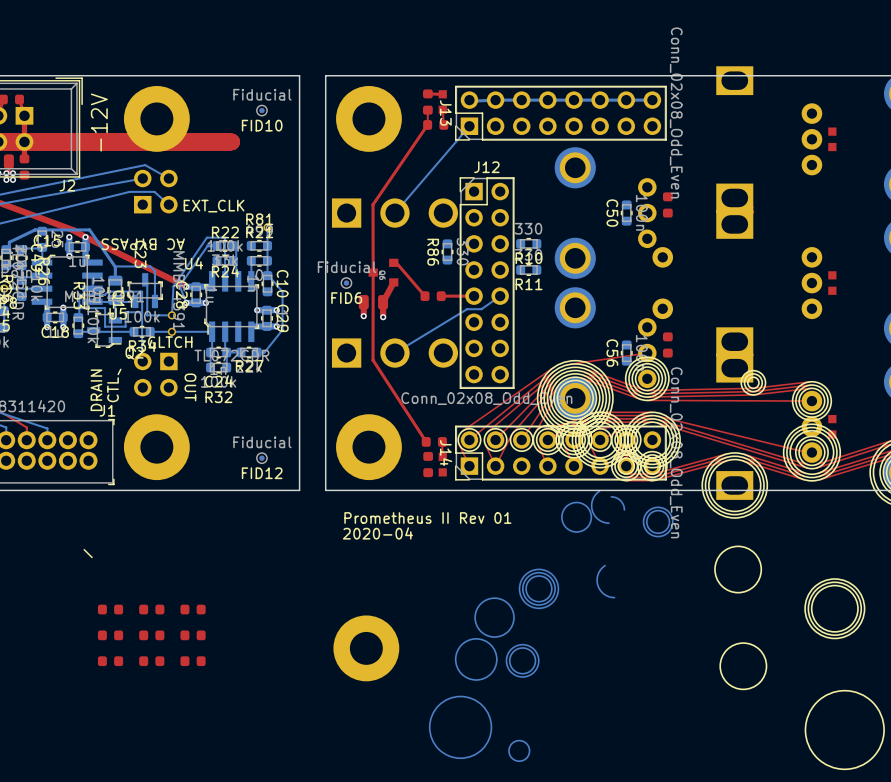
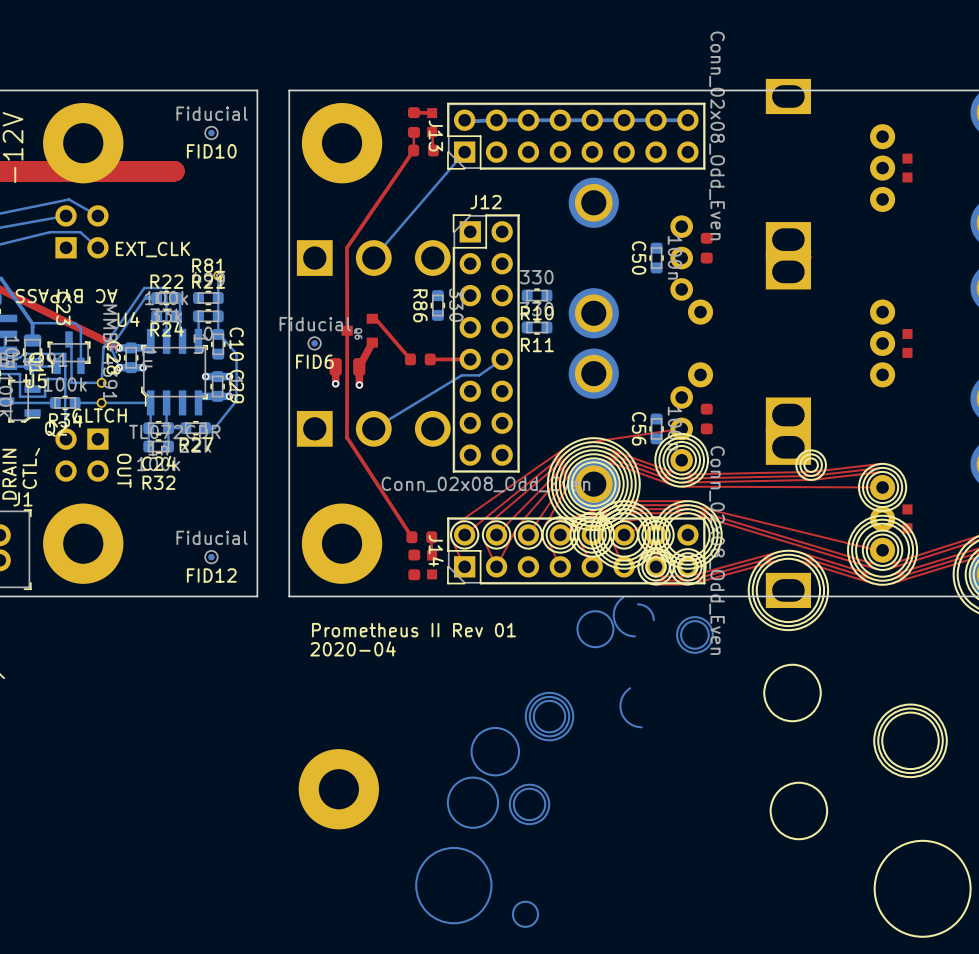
part: (110, 609) -> none
part: (151, 609) -> none
part: (193, 609) -> none
part: (110, 635) -> none
part: (151, 635) -> none
part: (193, 635) -> none
part: (110, 661) -> none
part: (151, 661) -> none
part: (193, 661) -> none

